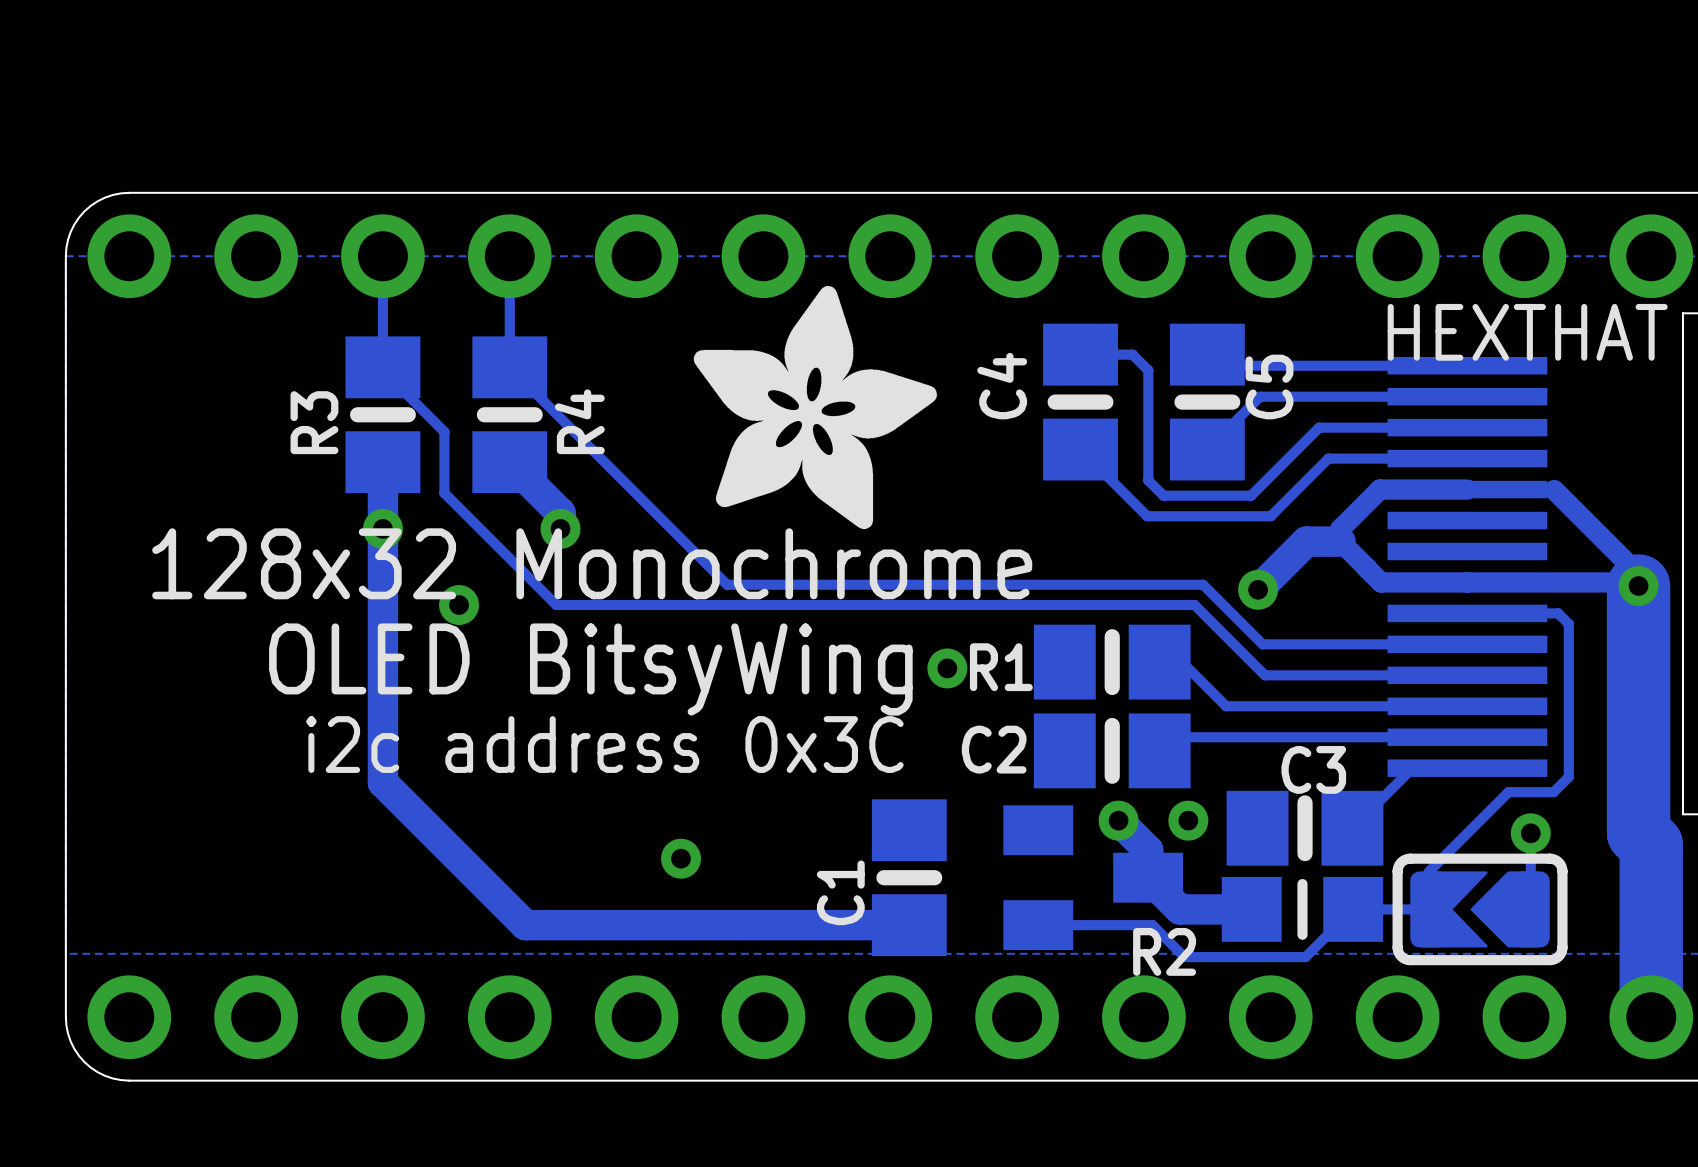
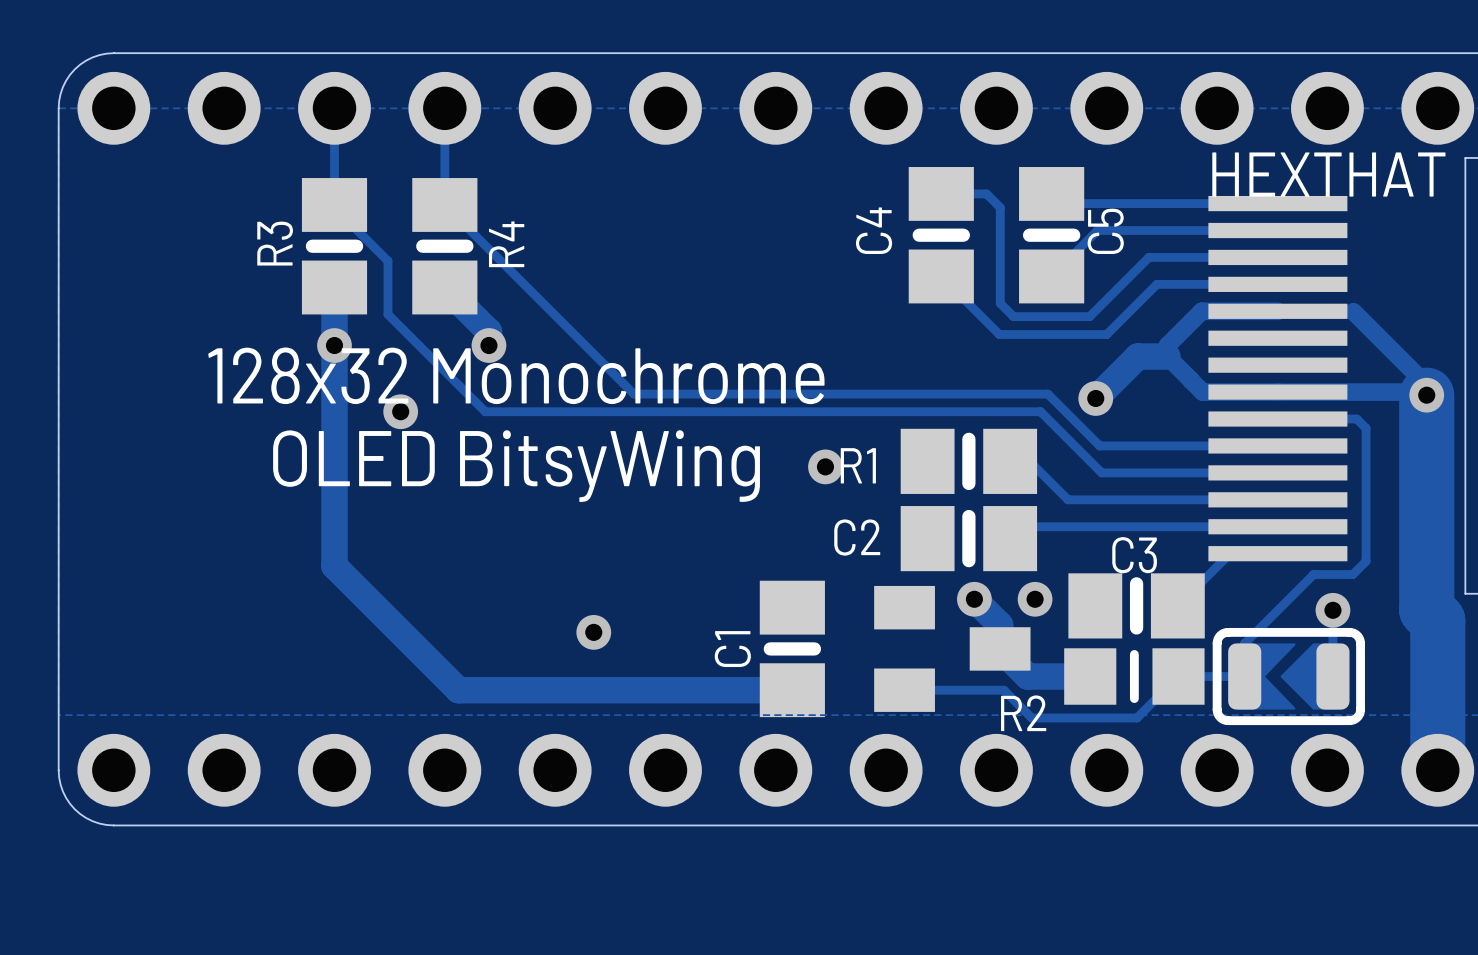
drawing: [693, 285, 938, 530] -> none
text: i2c address 0x3C (604, 744) -> none

